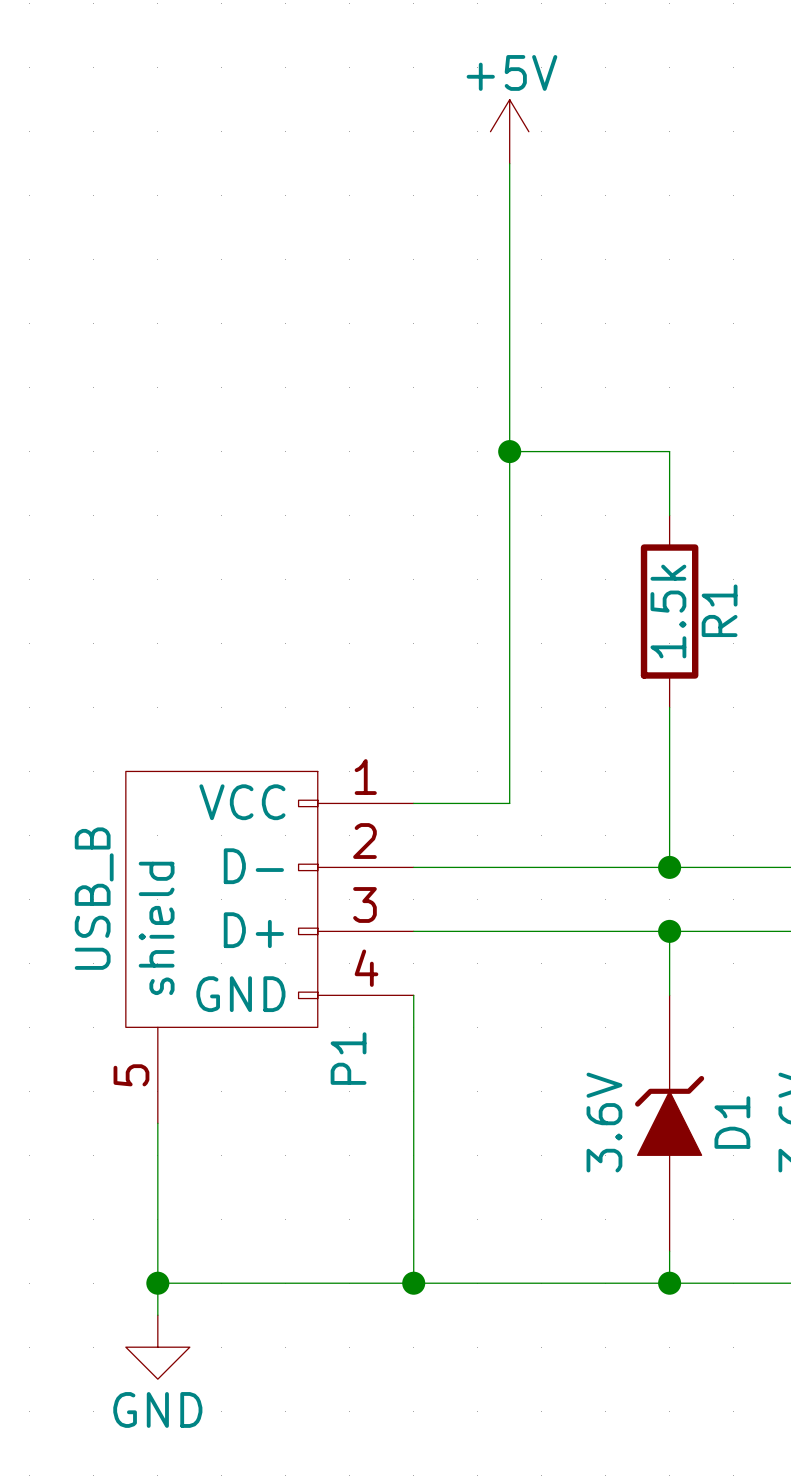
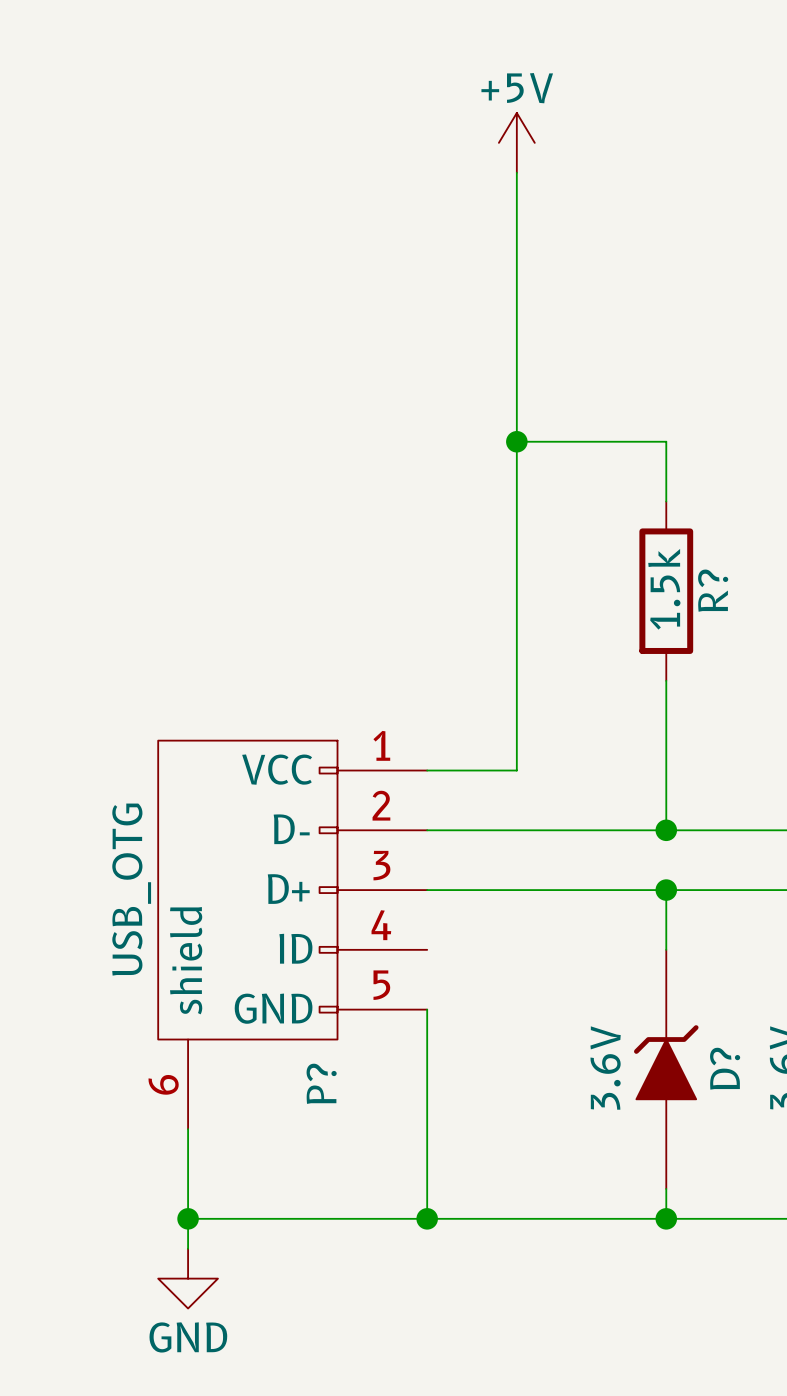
R1 name: R1 (719, 610) -> R? (713, 590)
P1: USB_B (269, 947) -> none
P?: none -> USB_OTG (292, 934)
wire: (413, 995) (413, 1059) -> none
D1 name: D1 (732, 1122) -> D? (725, 1068)

